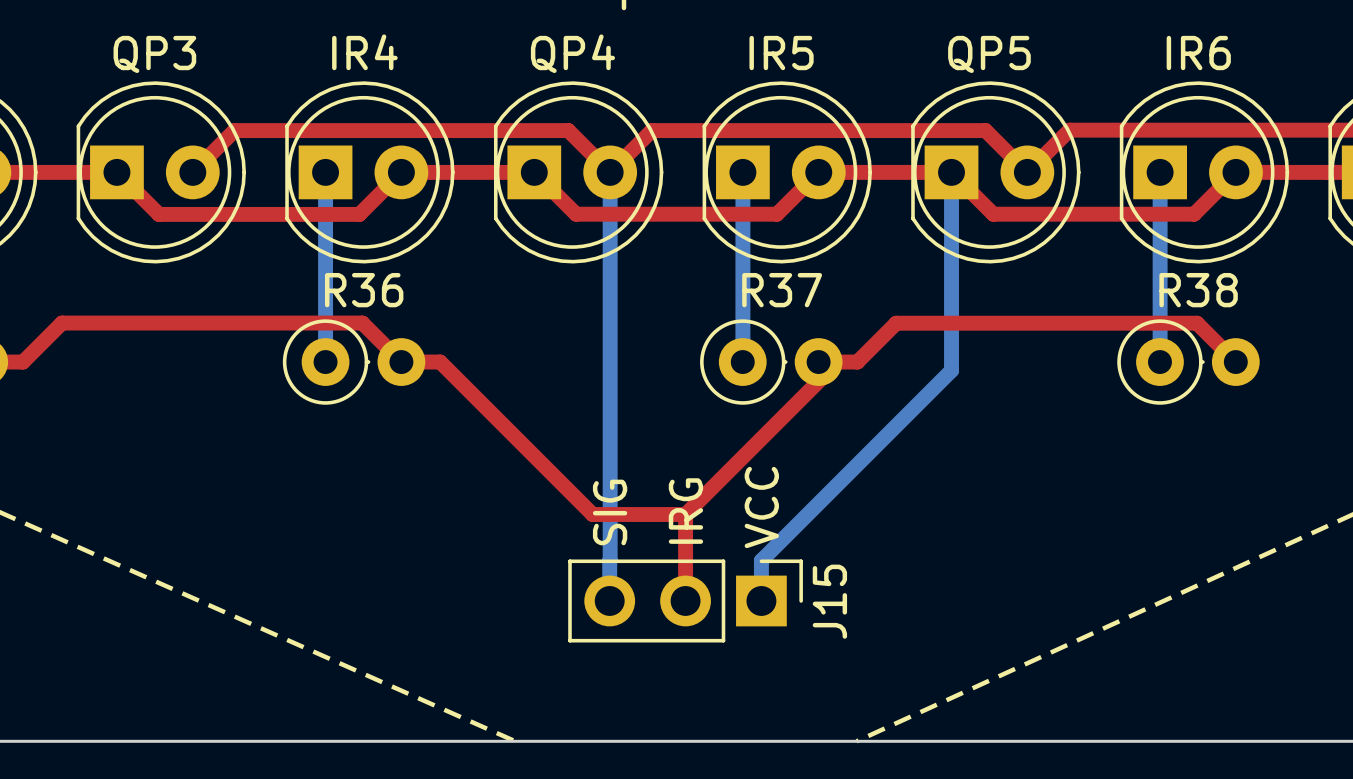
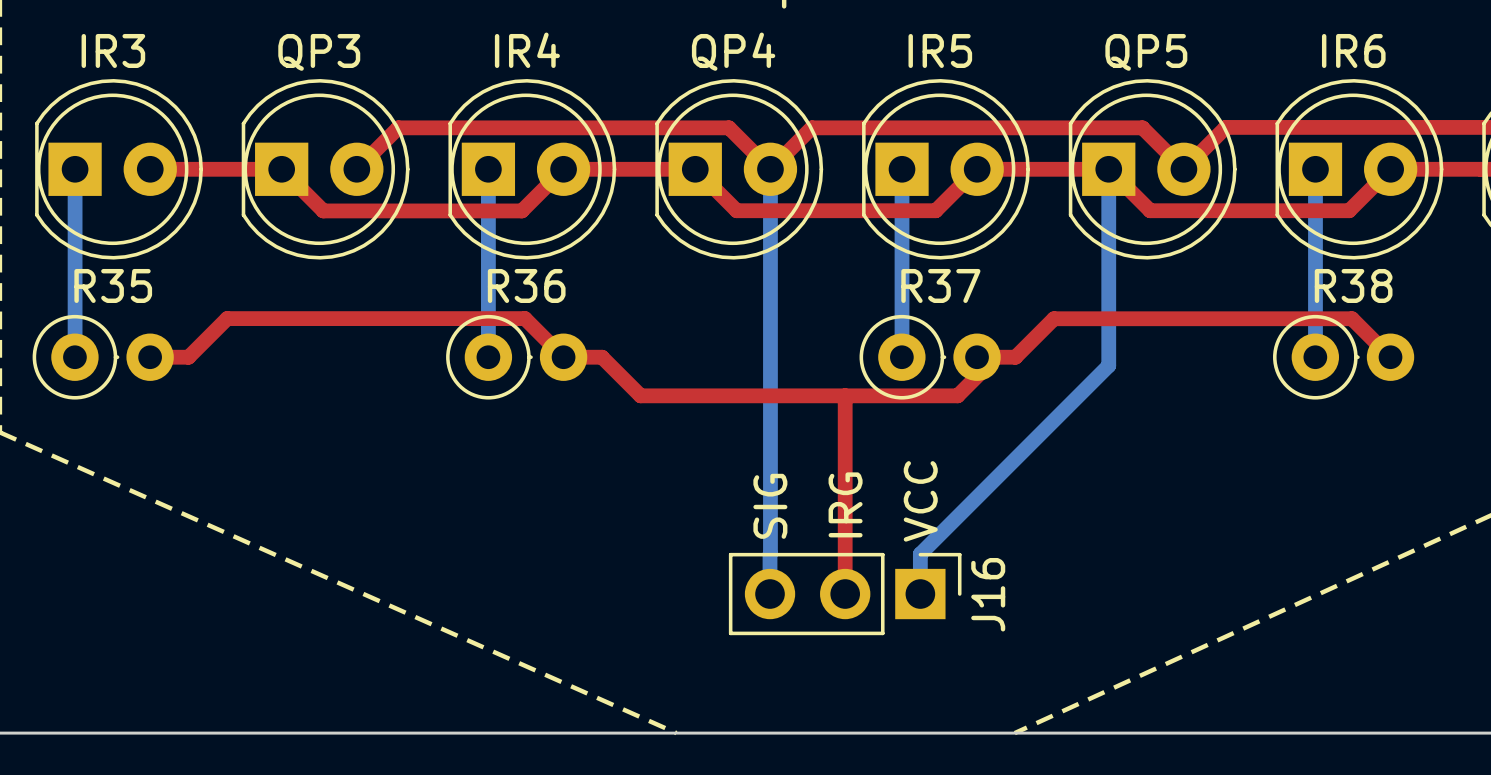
top track: (479, 400) (592, 514) (685, 514) (799, 400) -> (640, 395) (957, 395)
top track: none -> (845, 395) (845, 508)
J15 name: J15 (829, 601) -> J16 (988, 594)

